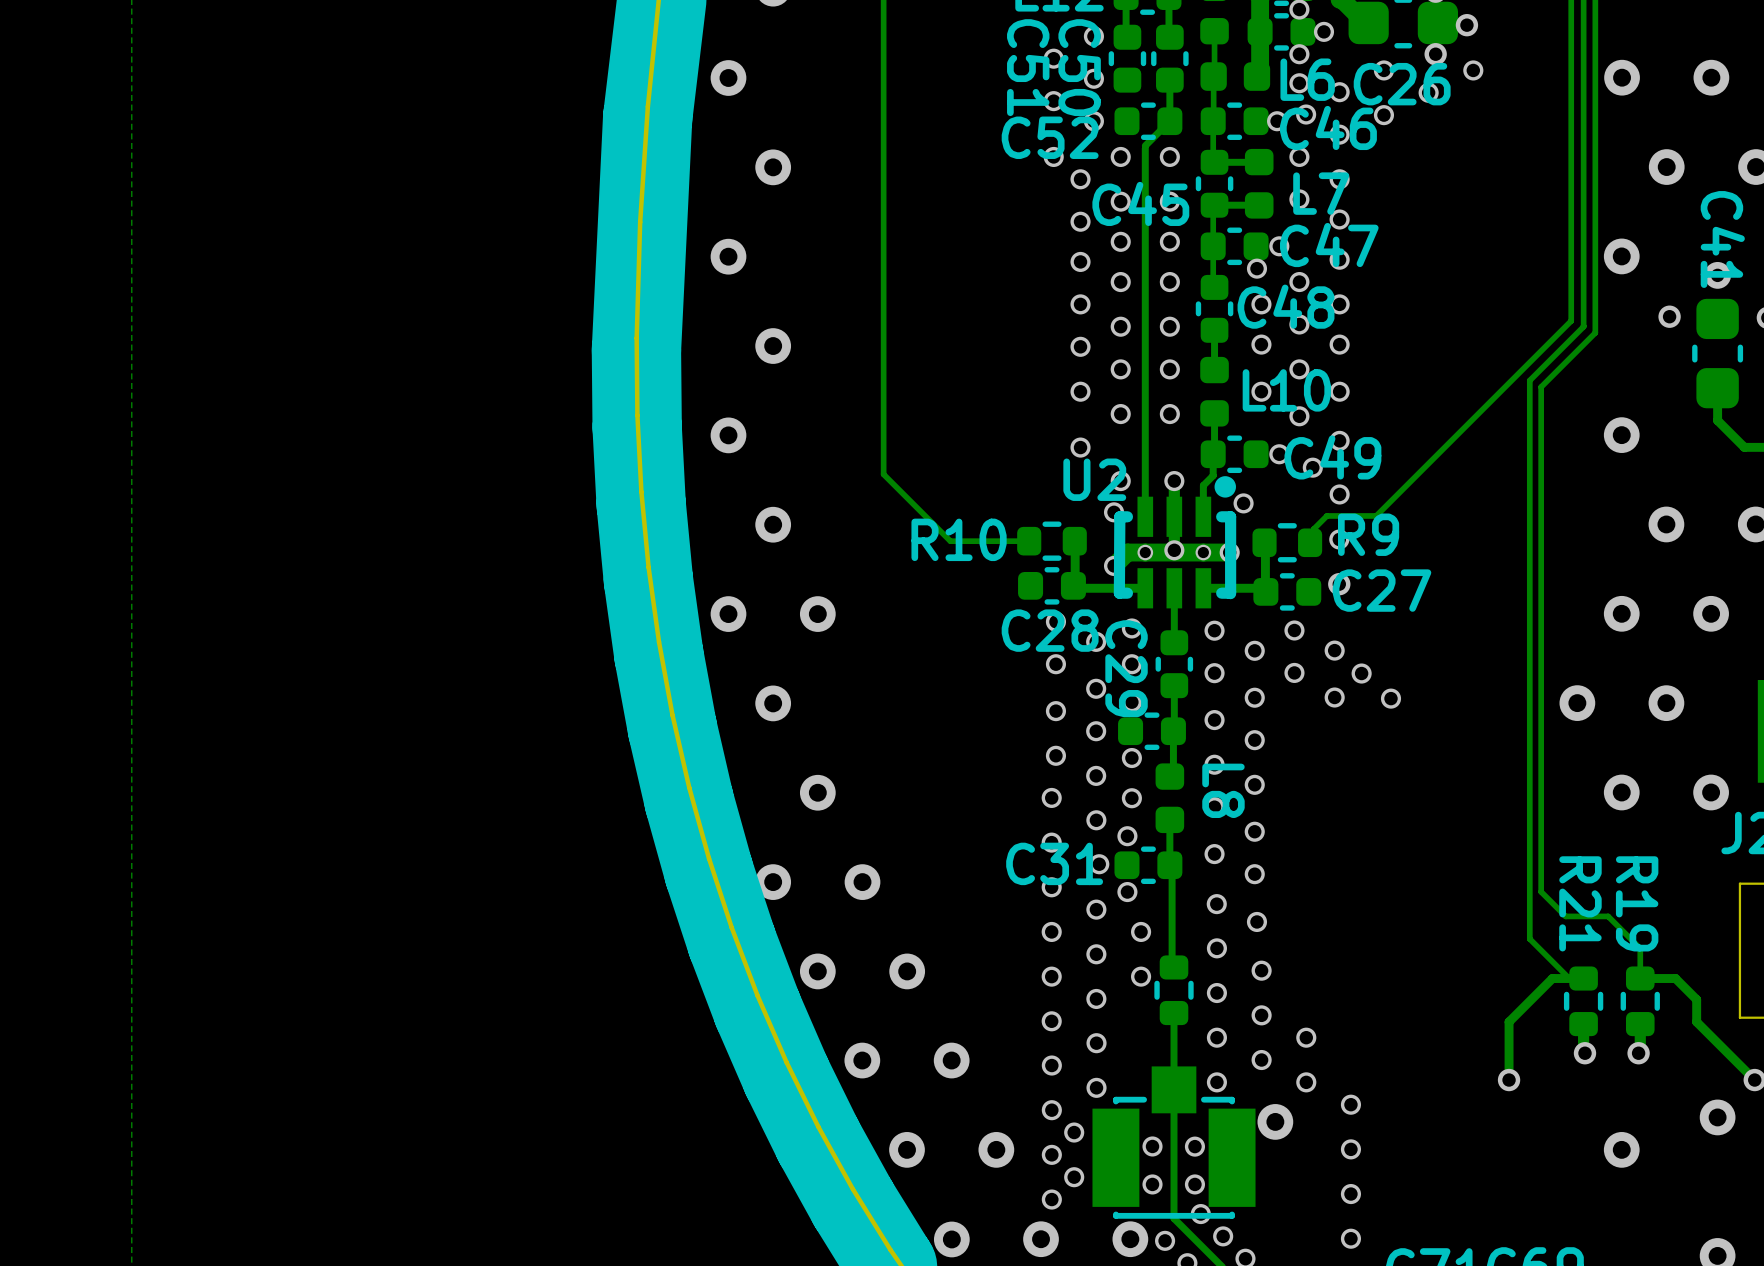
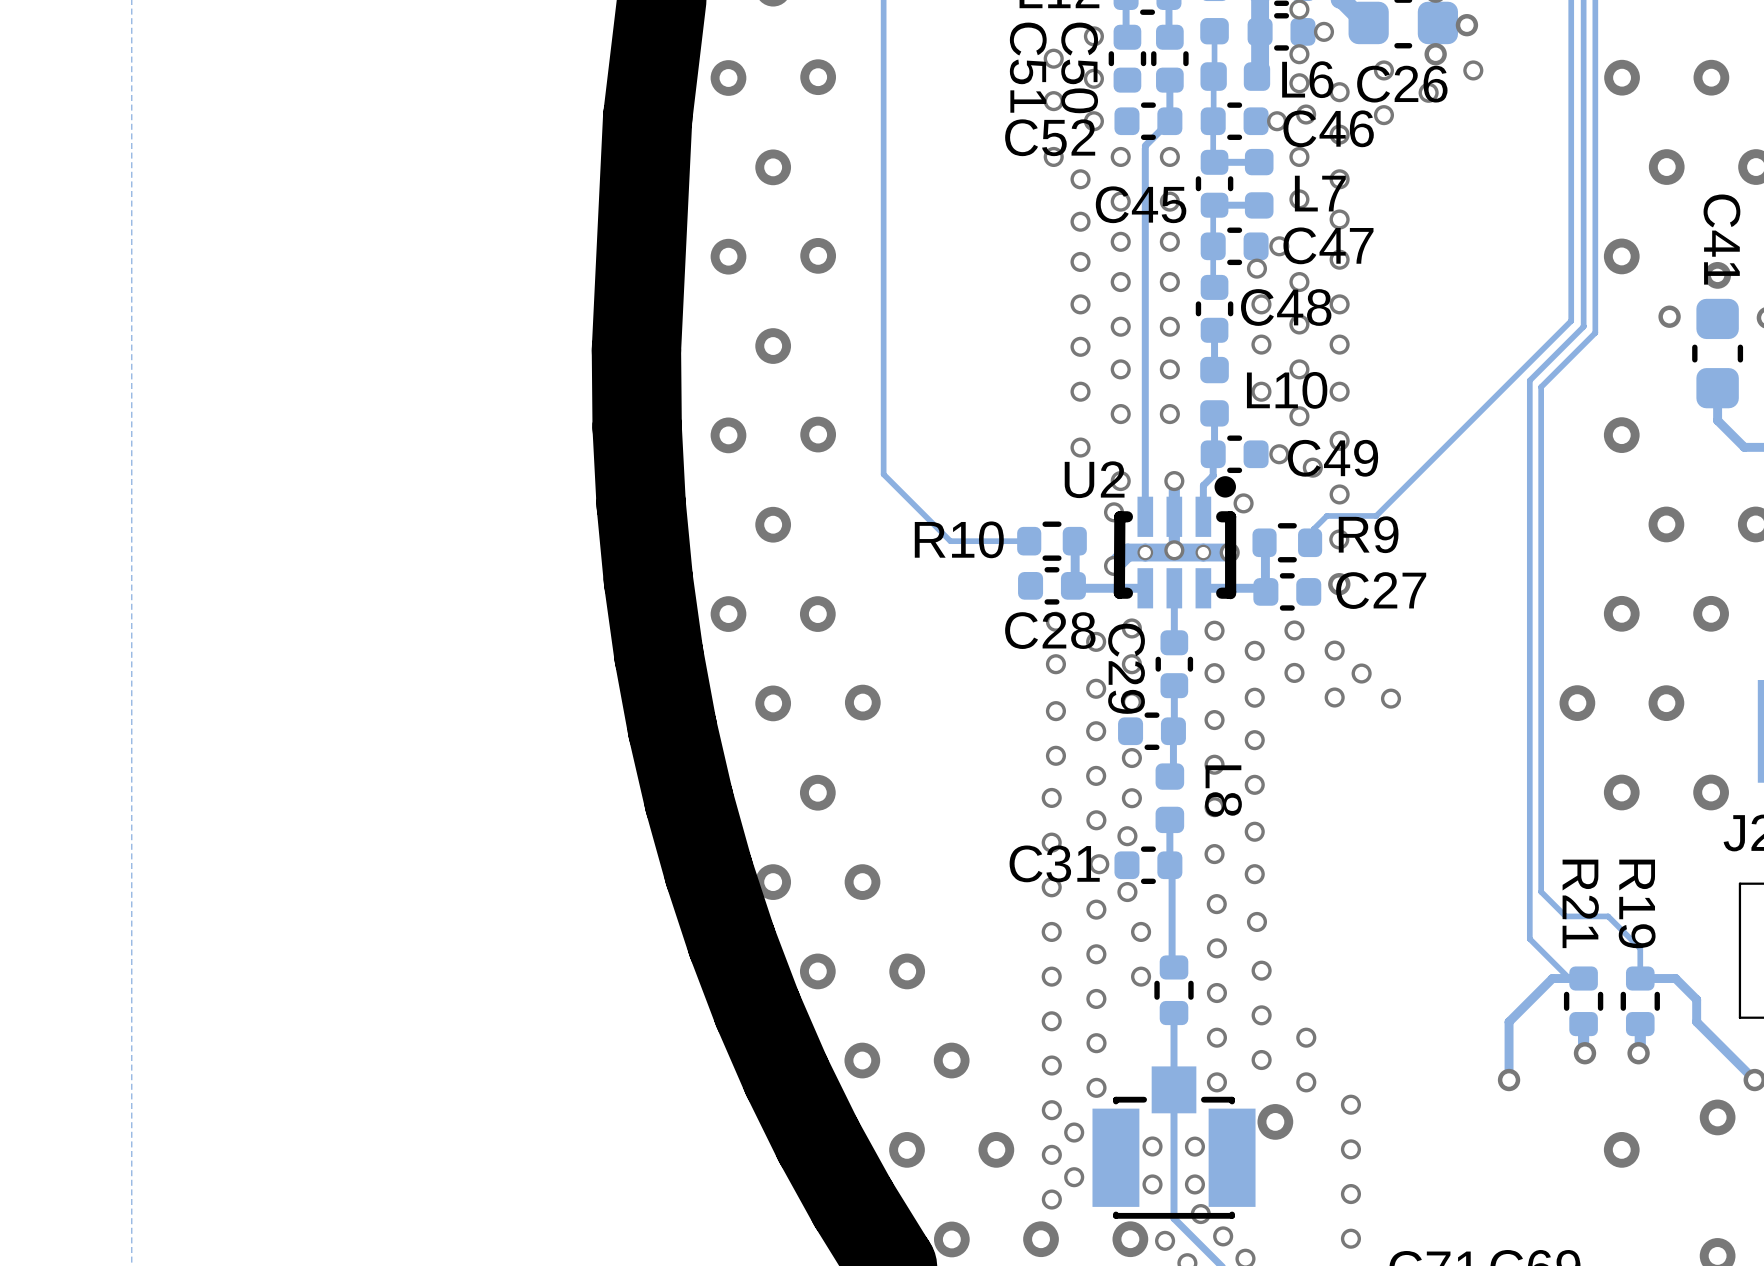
via: none -> (818, 77)
via: none -> (818, 255)
via: none -> (818, 434)
via: none -> (862, 702)

